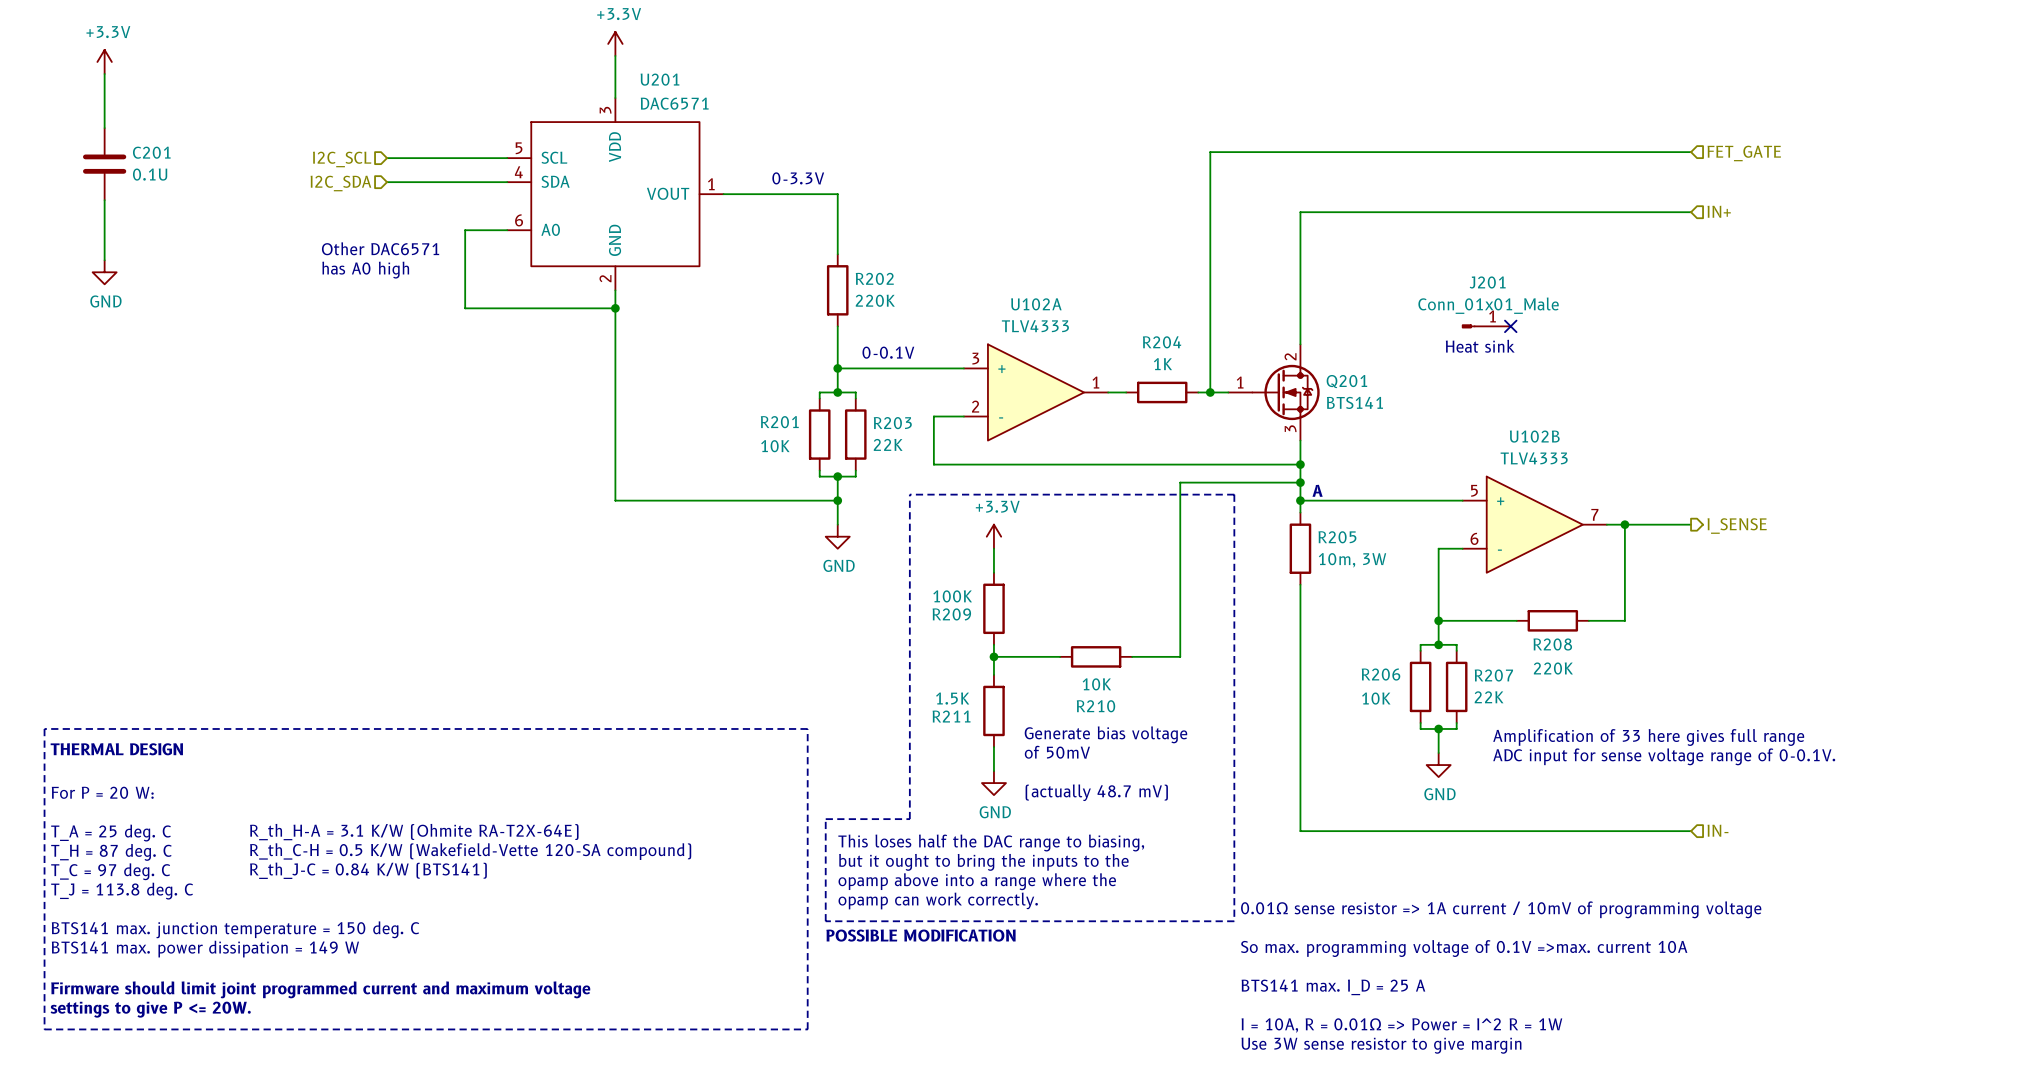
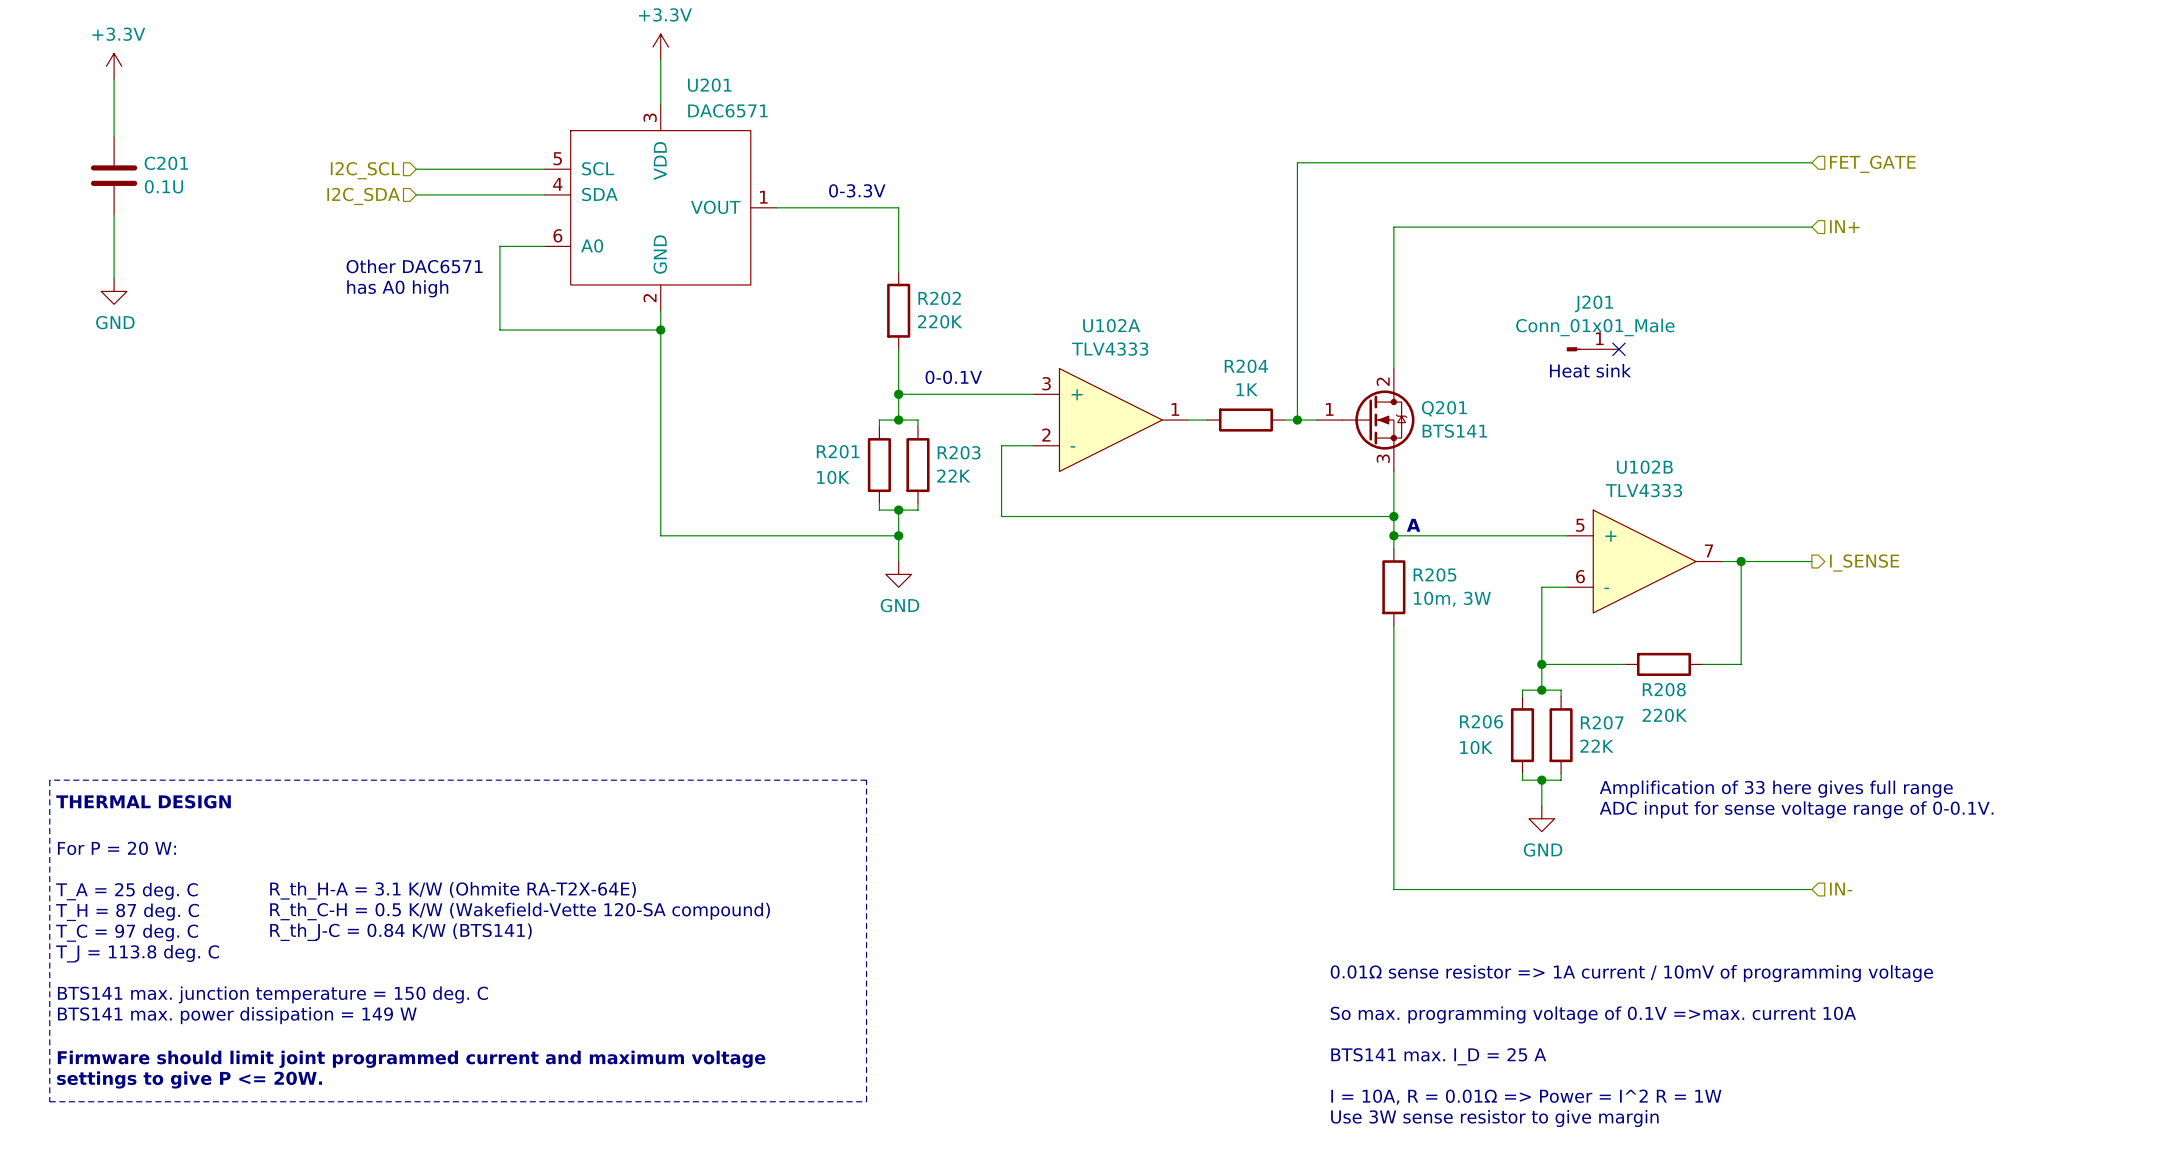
wire: (933, 464) (1300, 464) -> (1001, 497) (1001, 516) (1265, 516)
junction: (1300, 464) -> none
wire: (1180, 482) (1180, 656) (1132, 656) -> none
line: (909, 494) (909, 819) (825, 819) (825, 921) (1234, 921) (1234, 494) (909, 494) -> none
power symbol: +3.3V (993, 536) -> none
wire: (993, 548) (993, 572) -> none
R209: 100K (993, 608) -> none
wire: (993, 644) (993, 674) -> none
wire: (993, 656) (1060, 656) -> none
junction: (993, 656) -> none
R210: 10K (1096, 656) -> none
R211: 1.5K (993, 710) -> none
text: Generate bias voltage (1105, 734) -> none
wire: (993, 747) (993, 771) -> none
text: of 50mV (1057, 752) -> none
power symbol: GND (993, 783) -> none
text: (actually 48.7 mV) (1096, 792) -> none
text: This loses half the DAC range to biasing, (991, 843) -> none
text: but it ought to bring the inputs to the (983, 862) -> none
text: opamp above into a range where the (977, 881) -> none
text: opamp can work correctly. (938, 900) -> none
text: POSSIBLE MODIFICATION (920, 935) -> none

